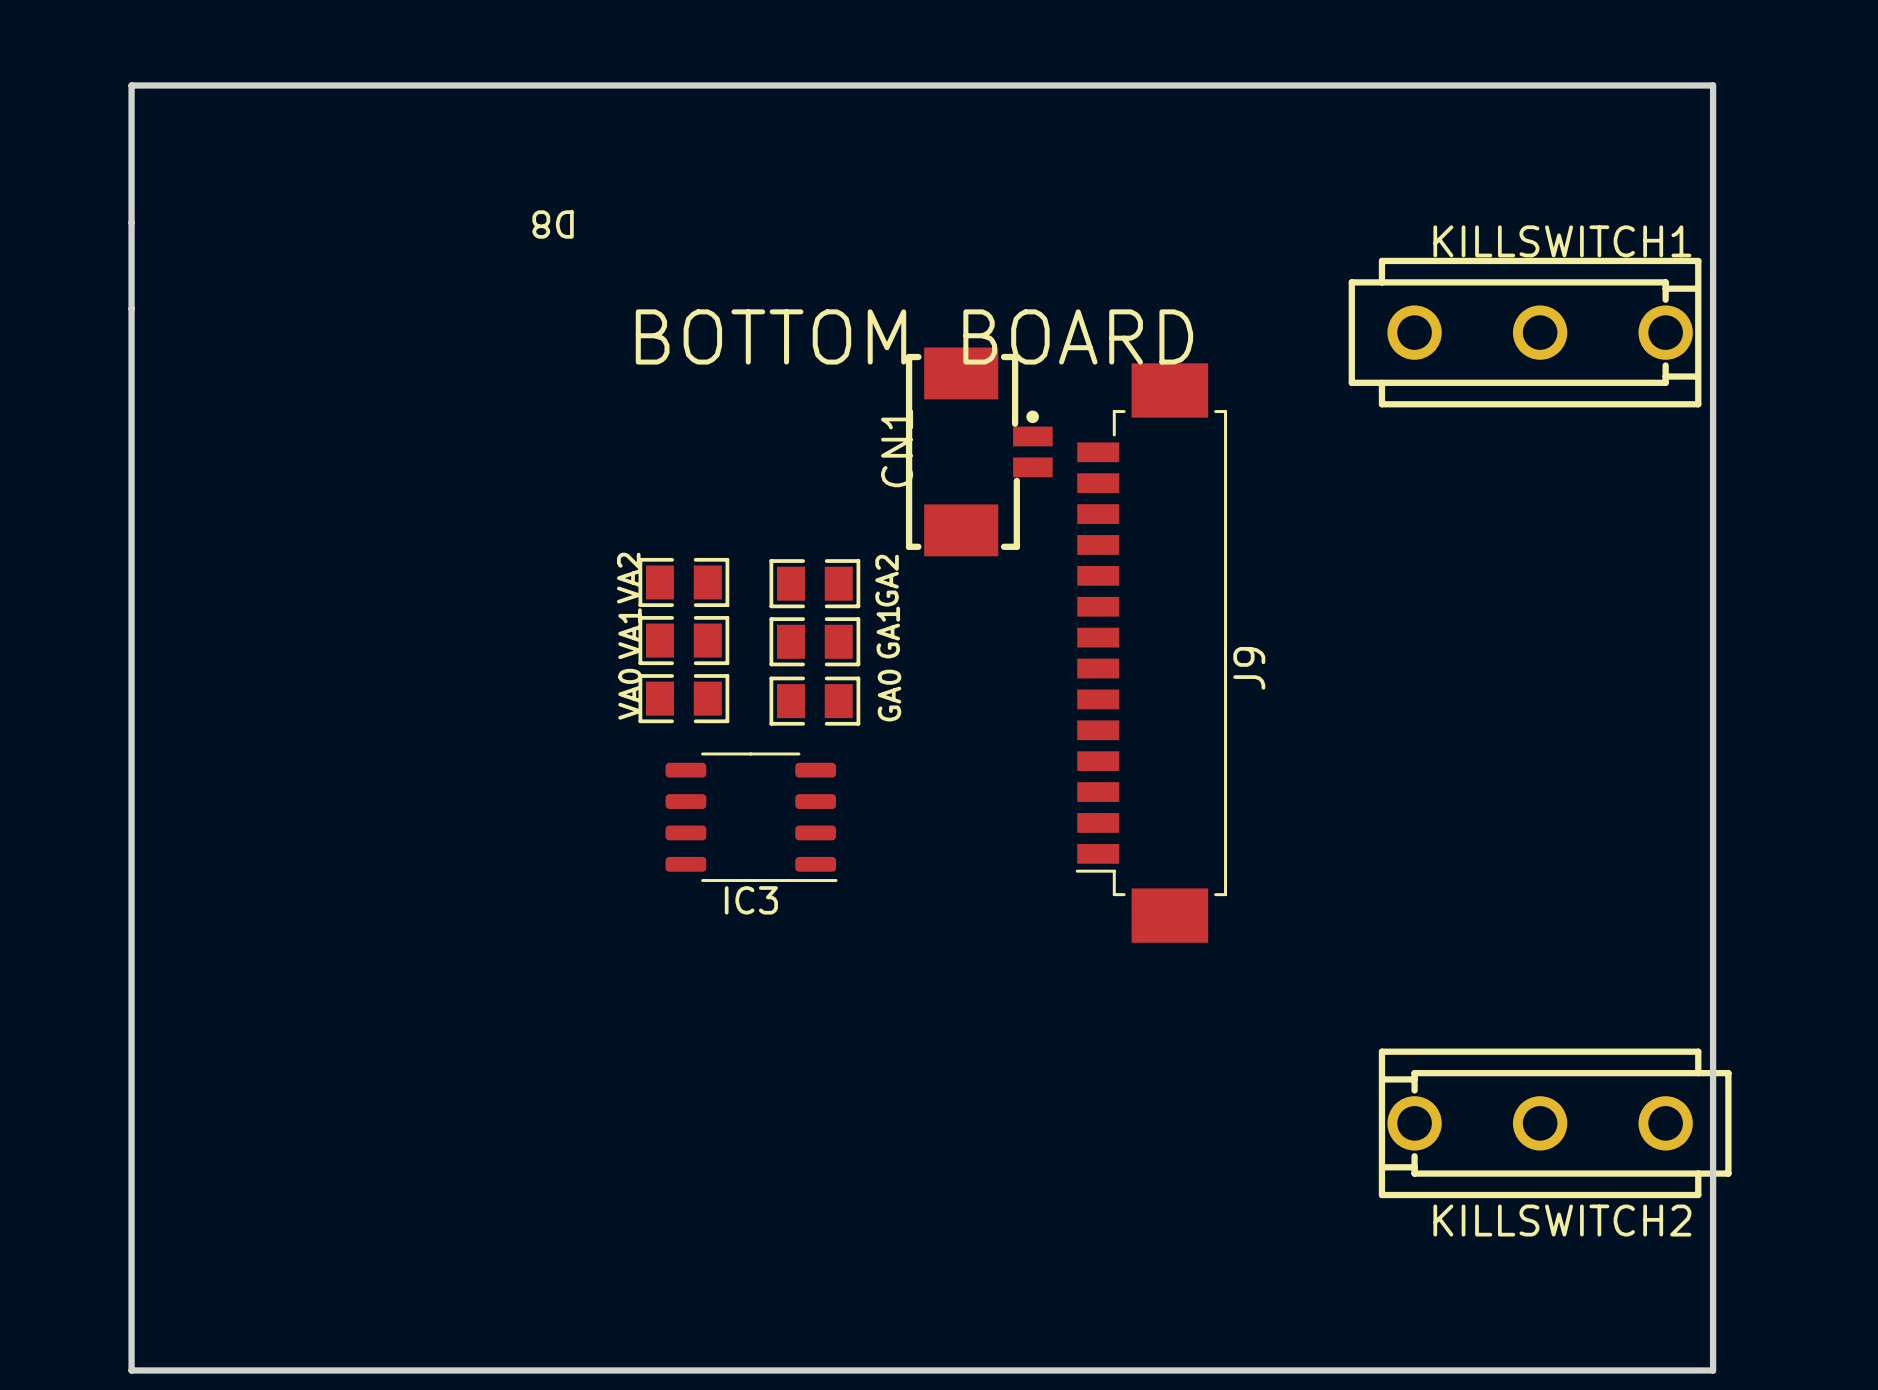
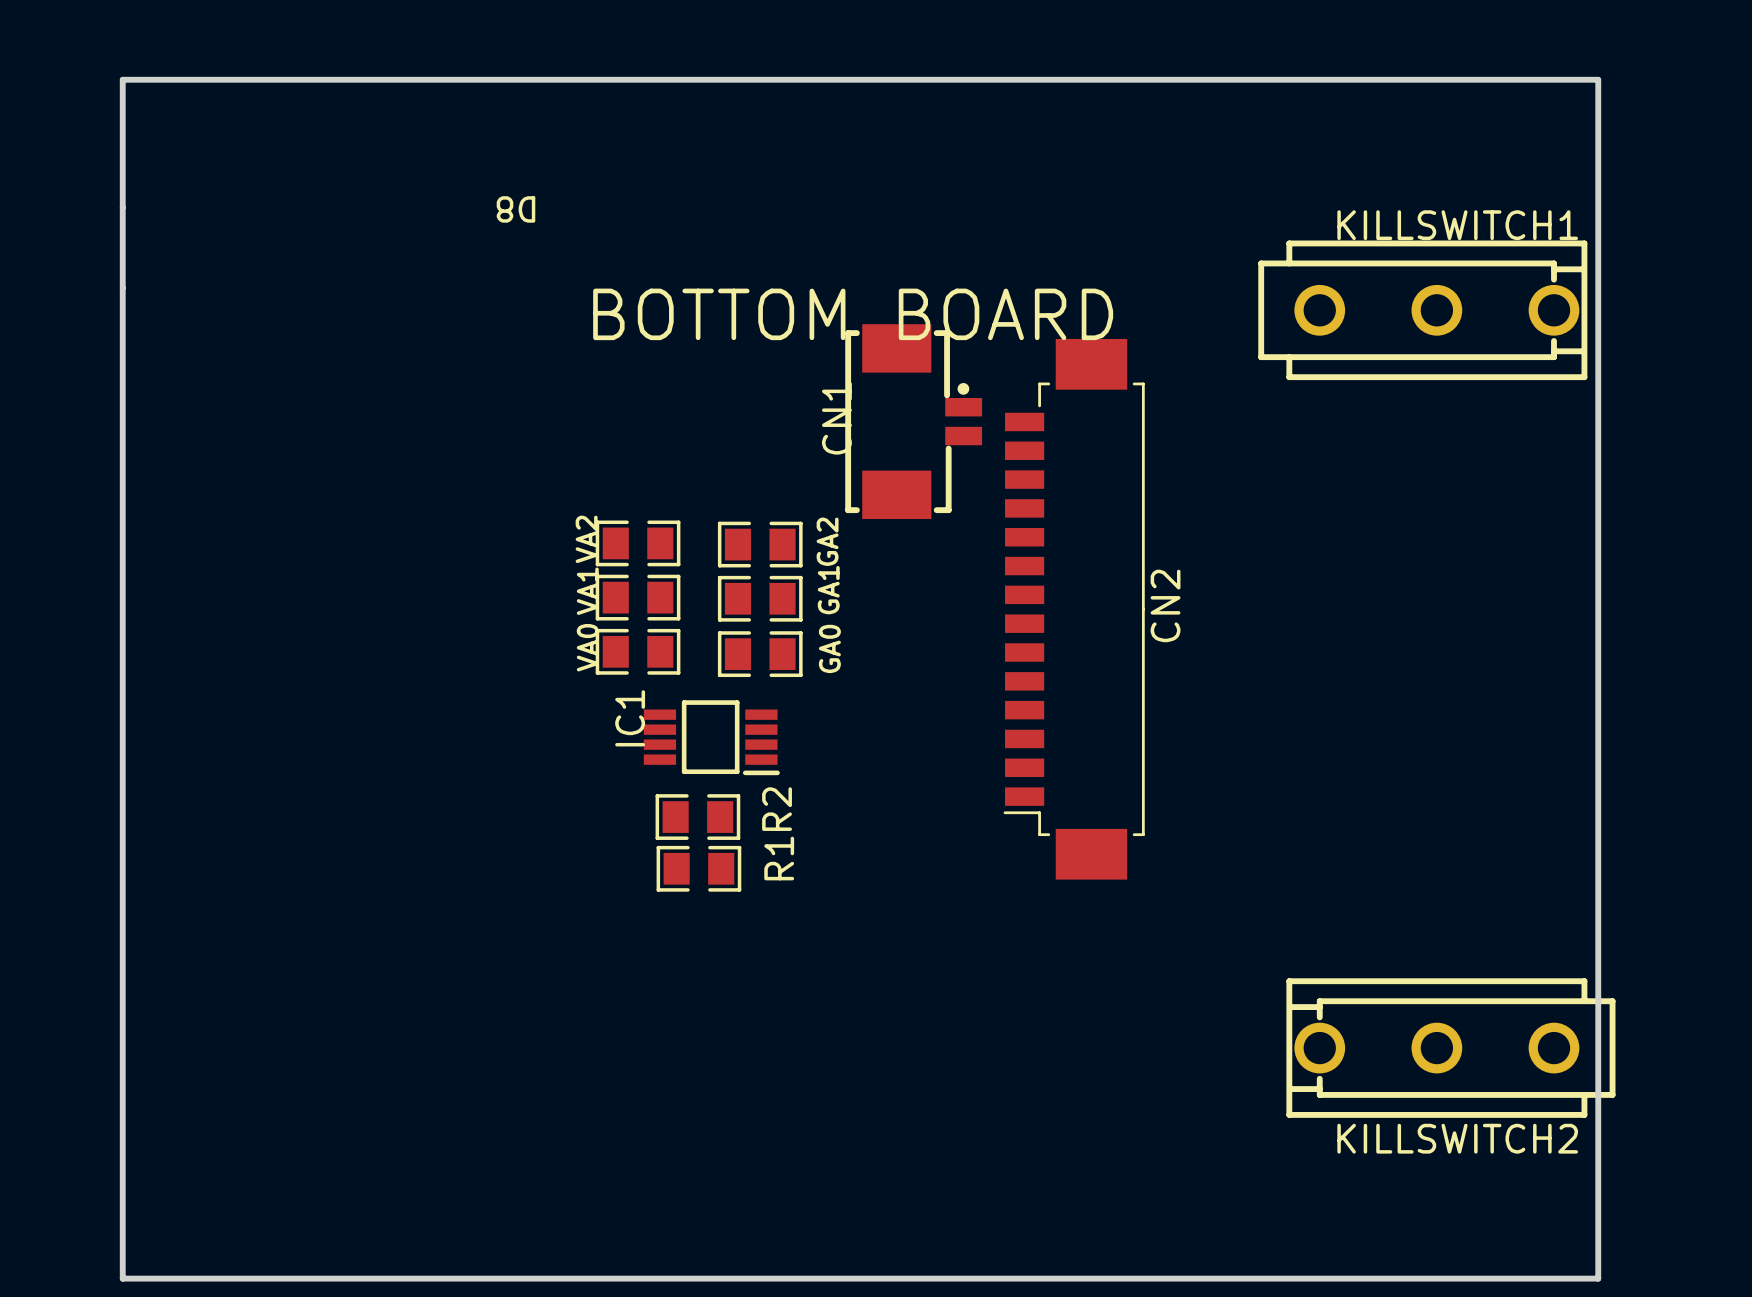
J9 name: J9 (1249, 668) -> CN2 (1165, 605)
IC1: none -> (711, 737)
IC3: (751, 817) -> none
R2: none -> (697, 817)
R1: none -> (698, 868)

